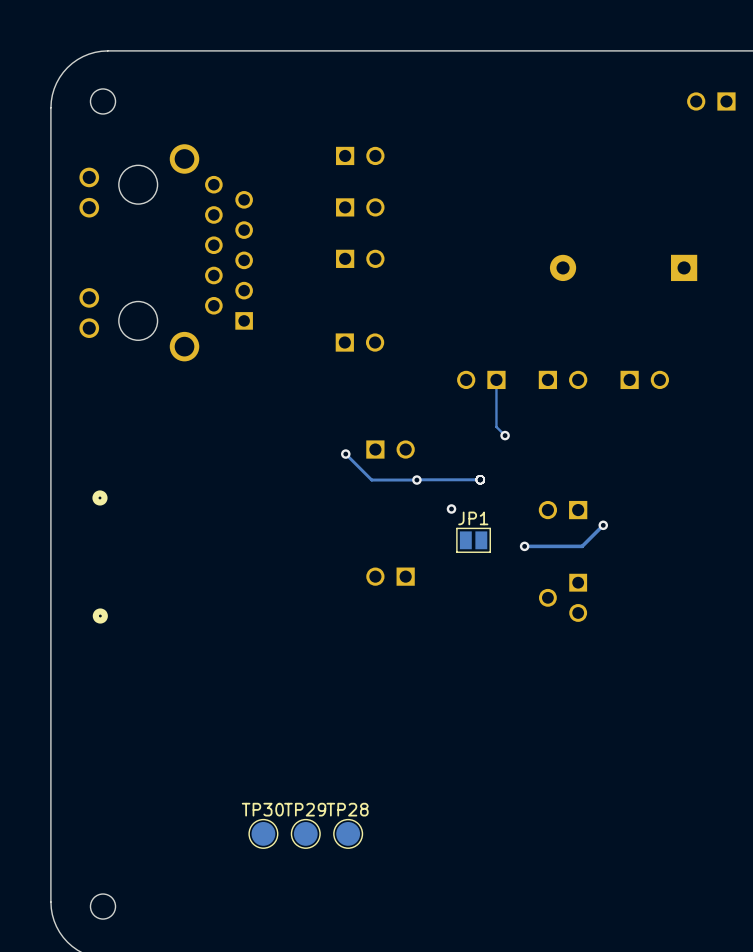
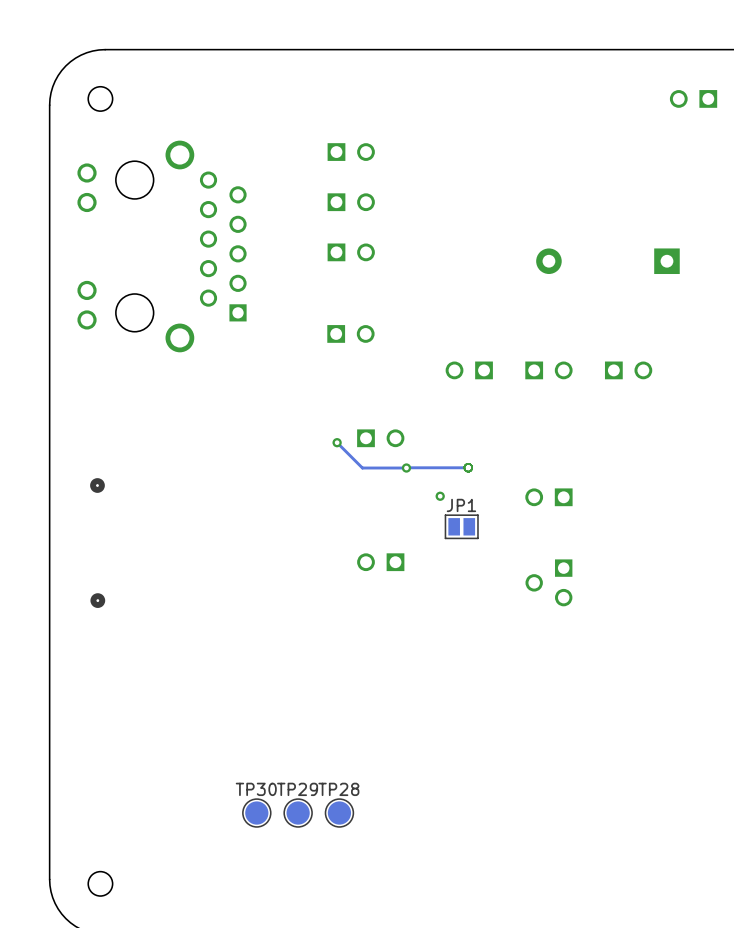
track: (496, 379) (496, 426) (505, 435) -> none
via: (505, 435) -> none
track: (603, 525) (582, 546) (524, 546) -> none
via: (603, 525) -> none
via: (524, 546) -> none

